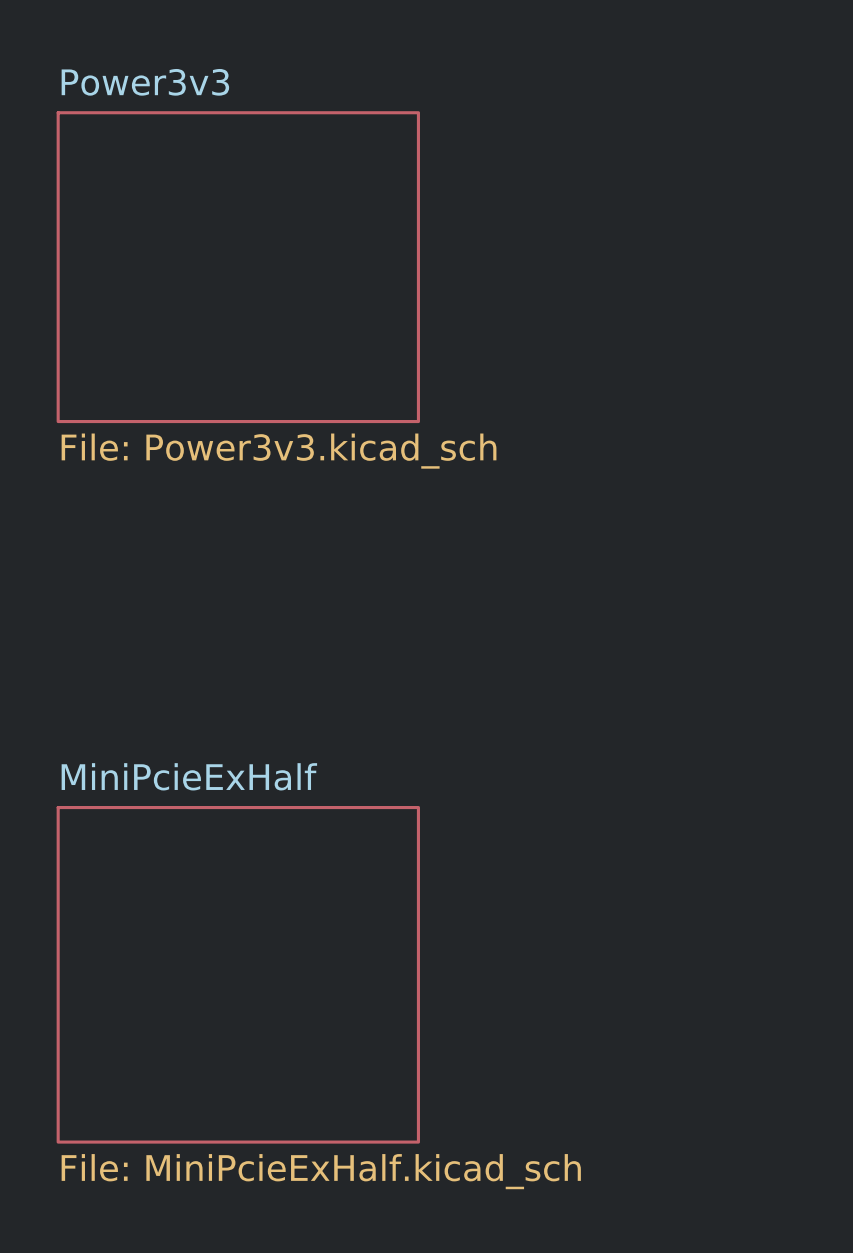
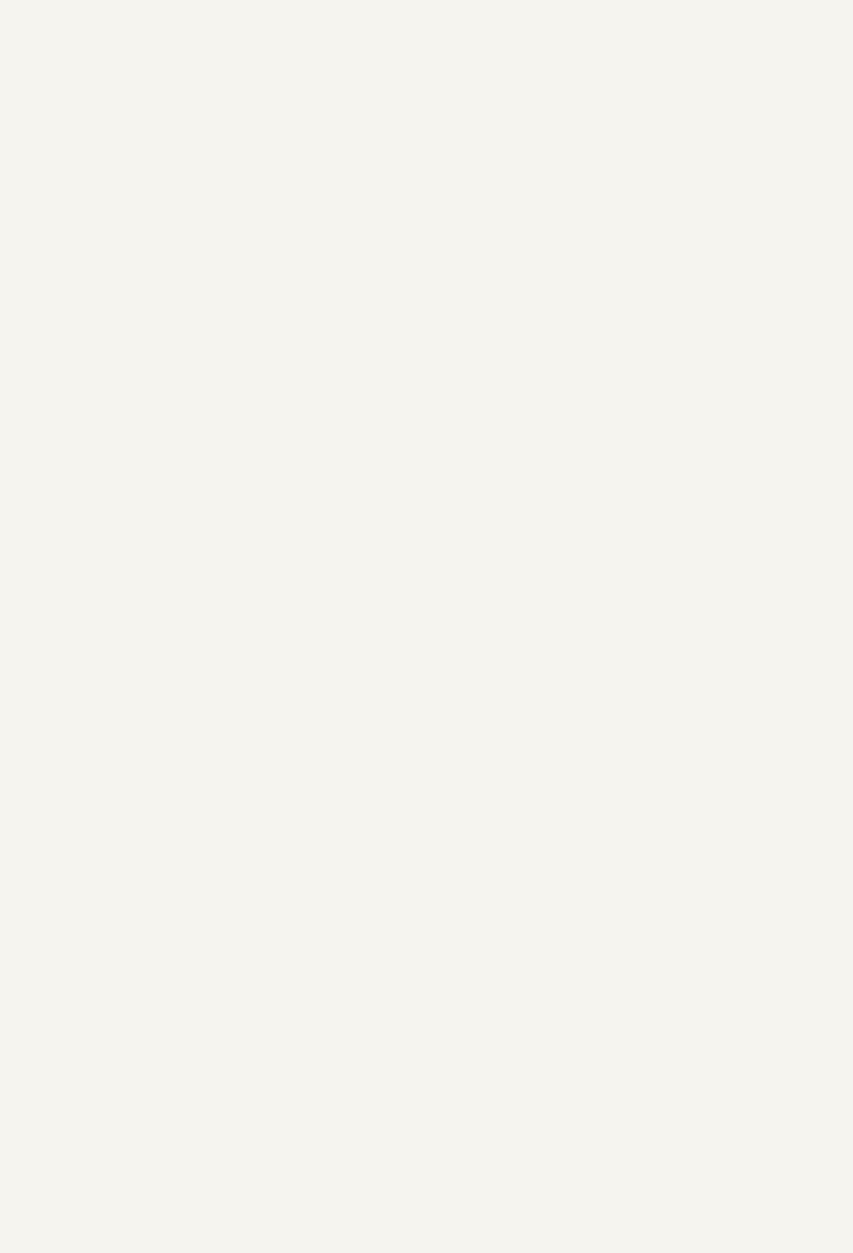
sheet Power3v3: File: Power3v3.kicad_sch (238, 267) -> none
sheet MiniPcieExHalf: File: MiniPcieExHalf.kicad_sch (238, 974) -> none

